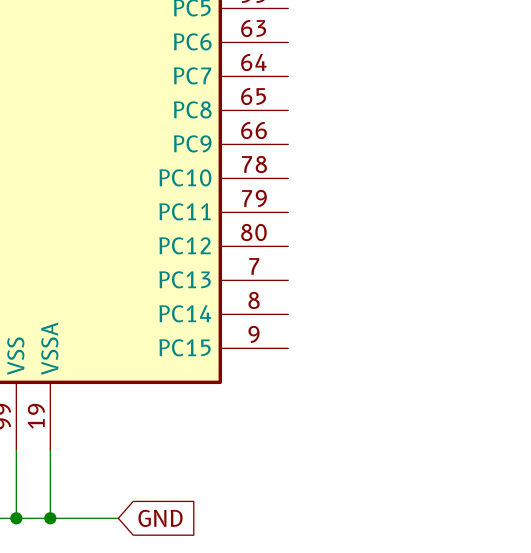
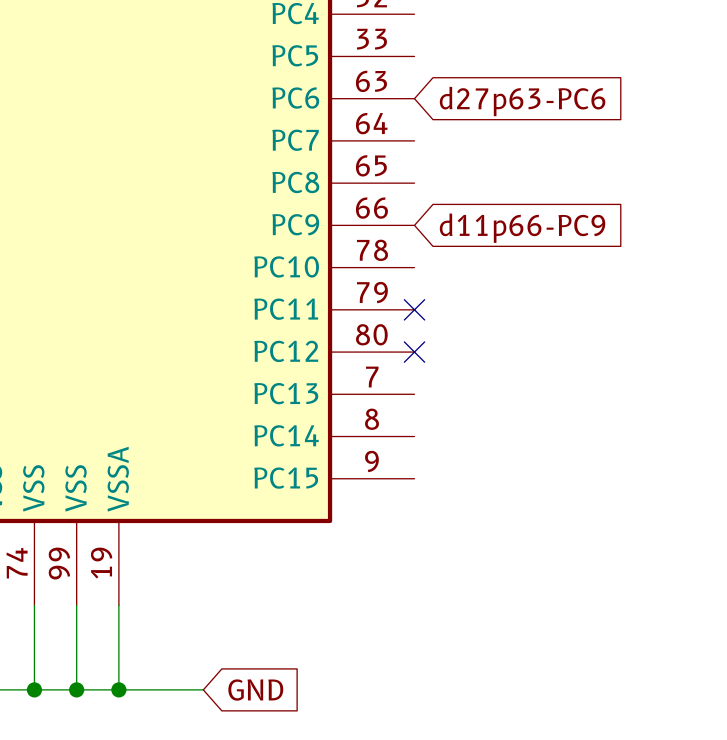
global label: none -> d27p63-PC6 (522, 101)
global label: none -> d11p66-PC9 (522, 228)
no-connect mark: none -> (414, 309)
no-connect mark: none -> (414, 352)

